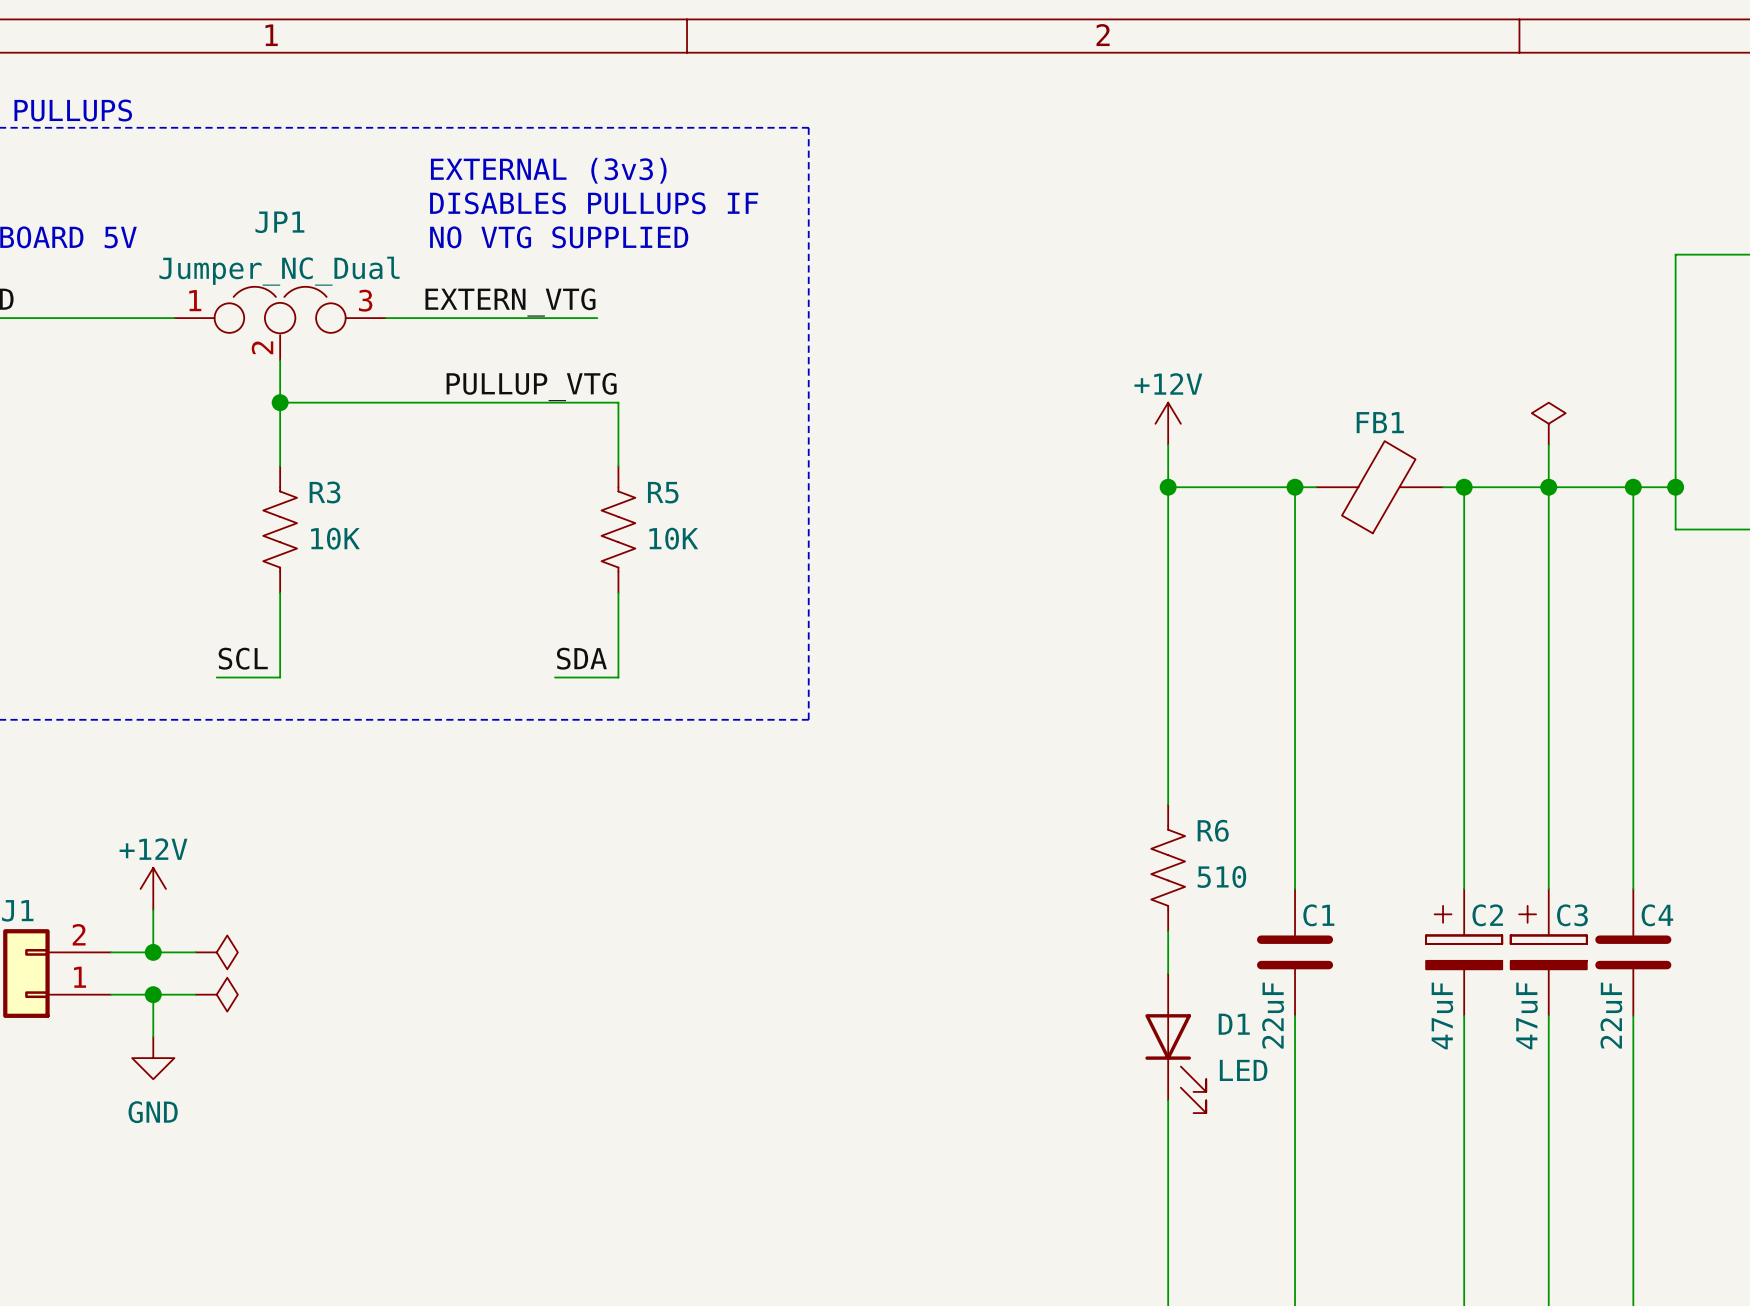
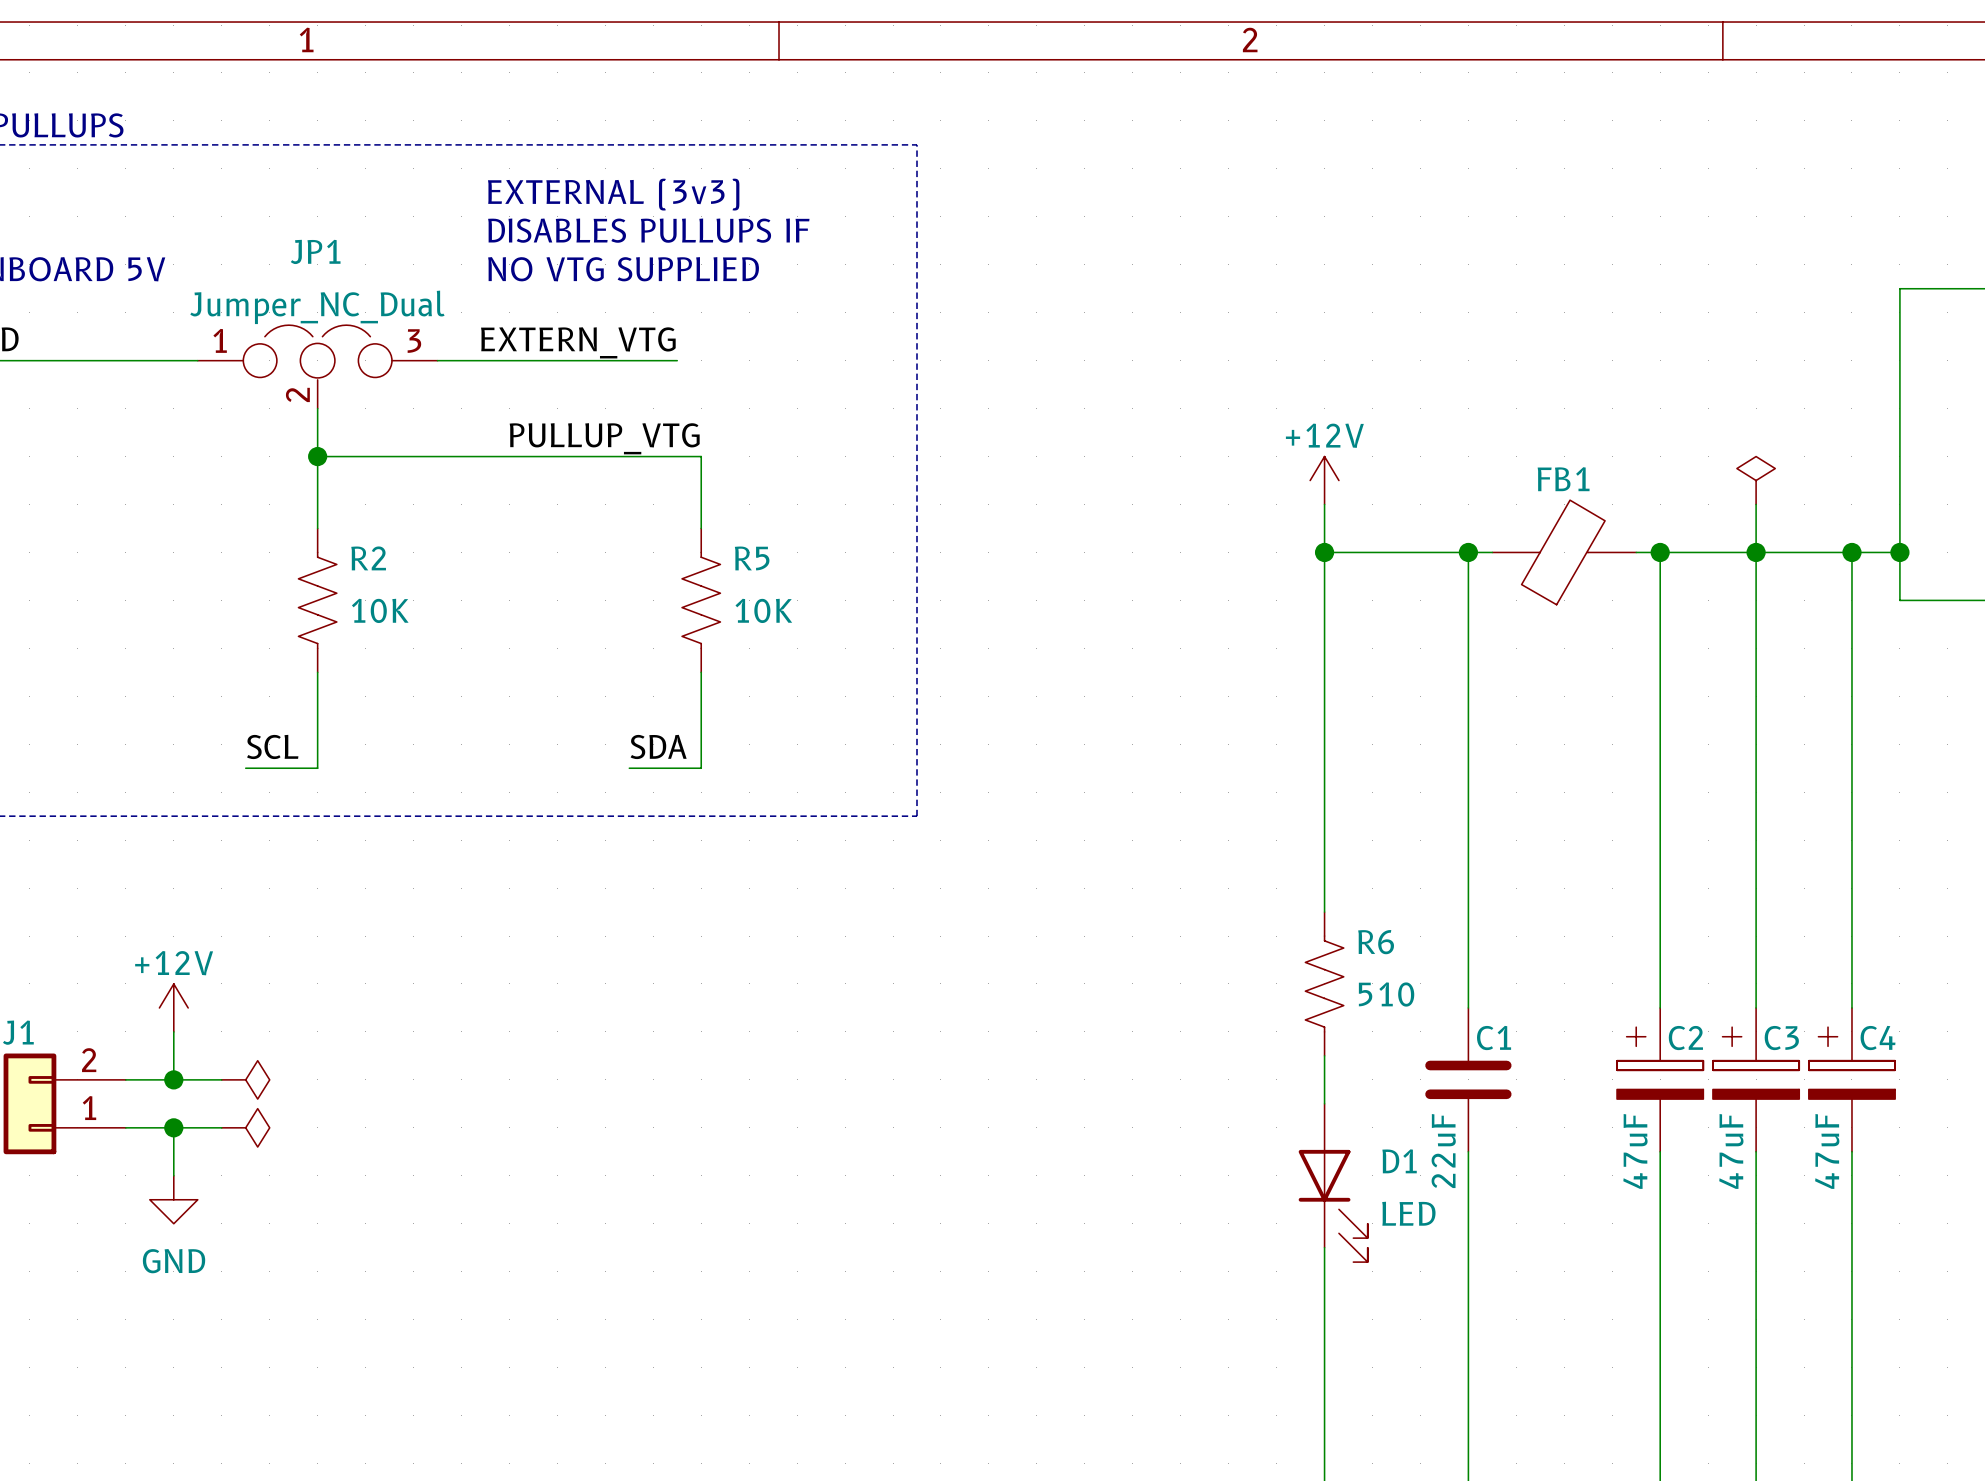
R3 name: R3 (325, 492) -> R2 (368, 558)
C4 symbol: [1595, 888, 1672, 1016] -> [1808, 1007, 1896, 1152]
C4 text: 22uF (1611, 1015) -> 47uF (1827, 1151)

